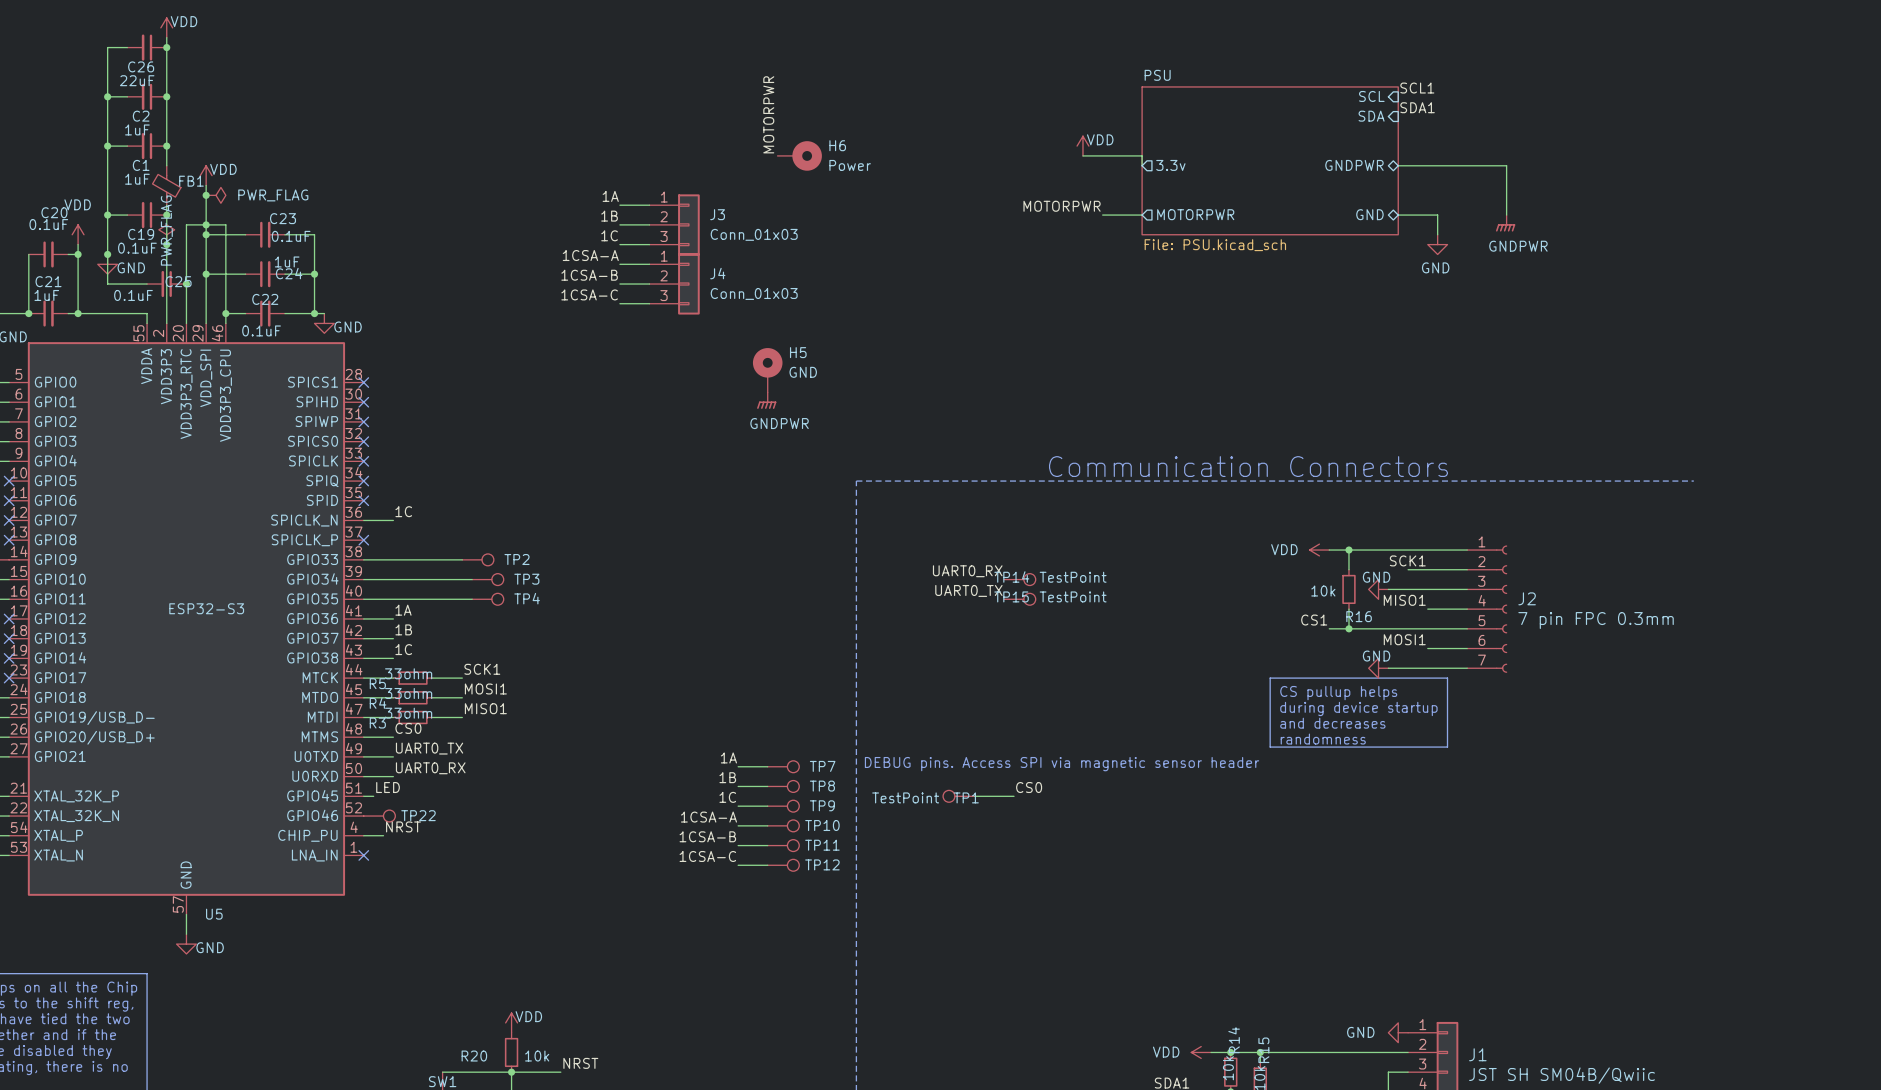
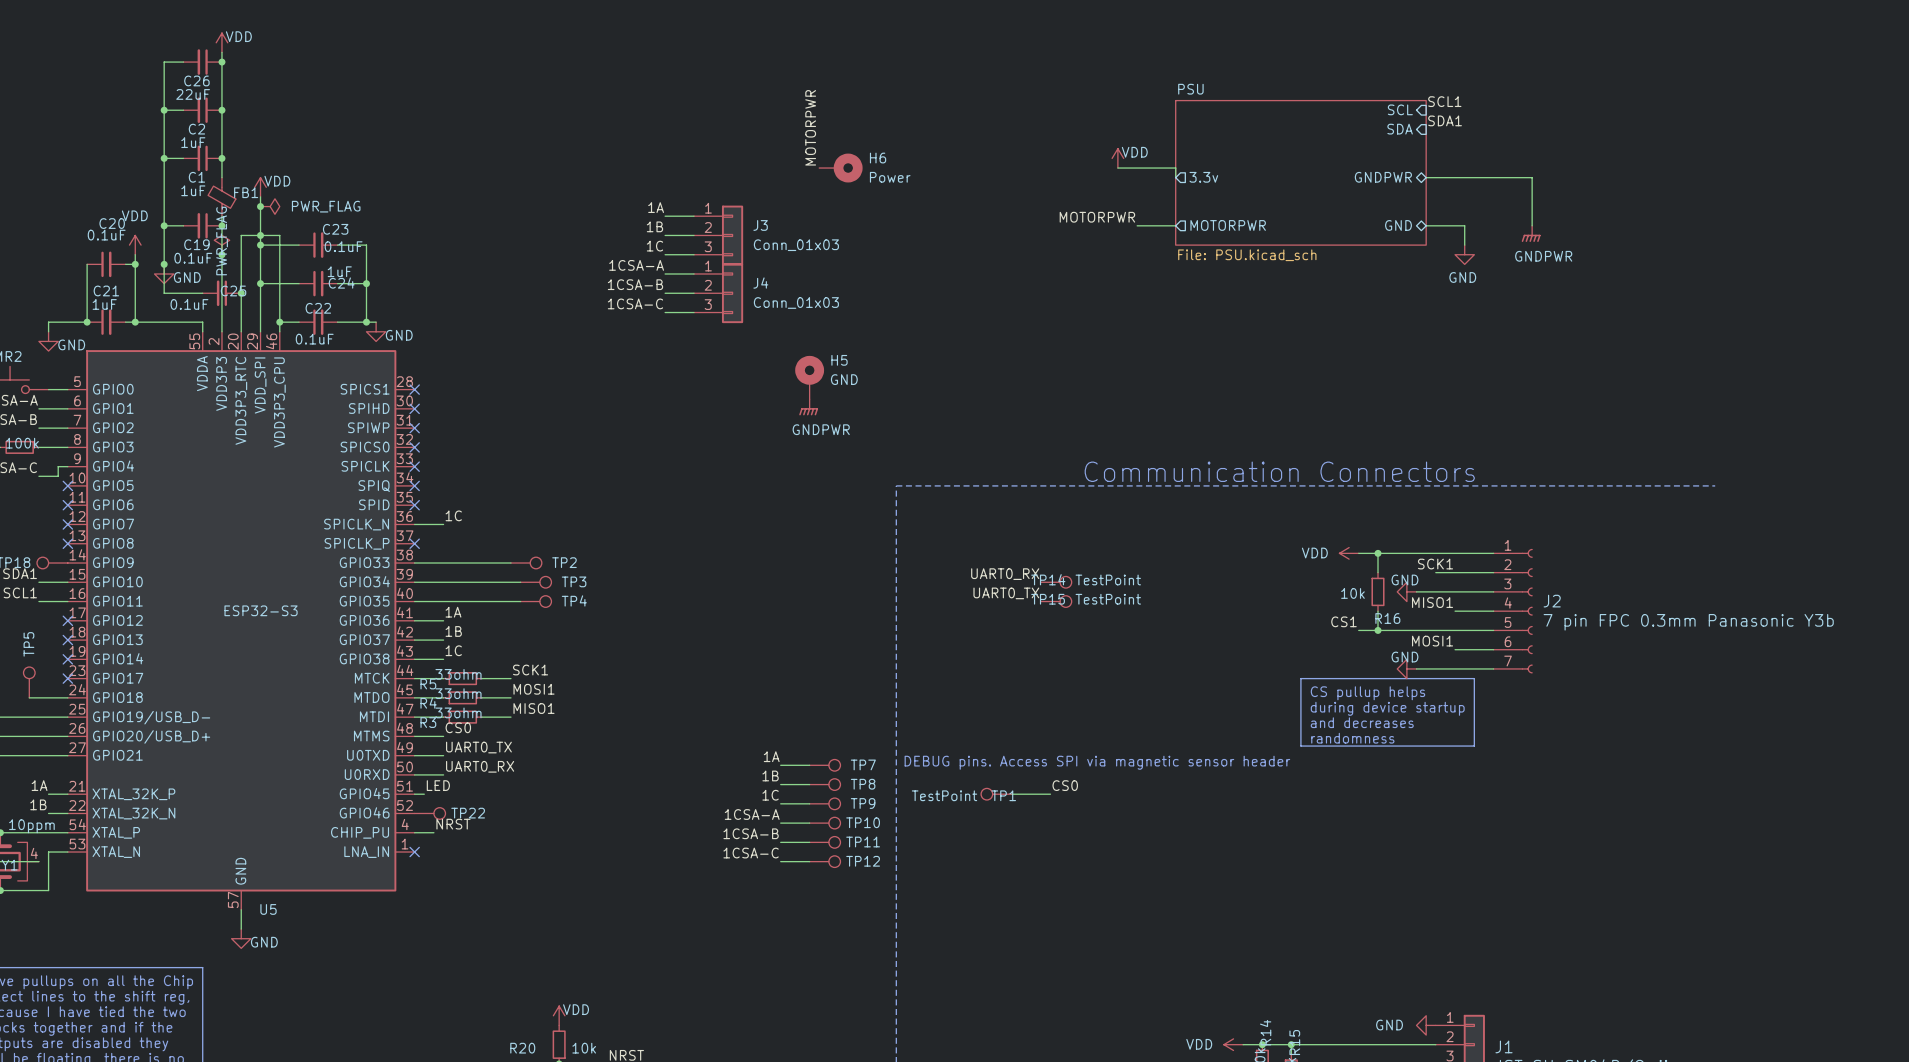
J2 value: 7 pin FPC 0.3mm (1596, 620) -> 7 pin FPC 0.3mm Panasonic Y3b (1688, 622)

